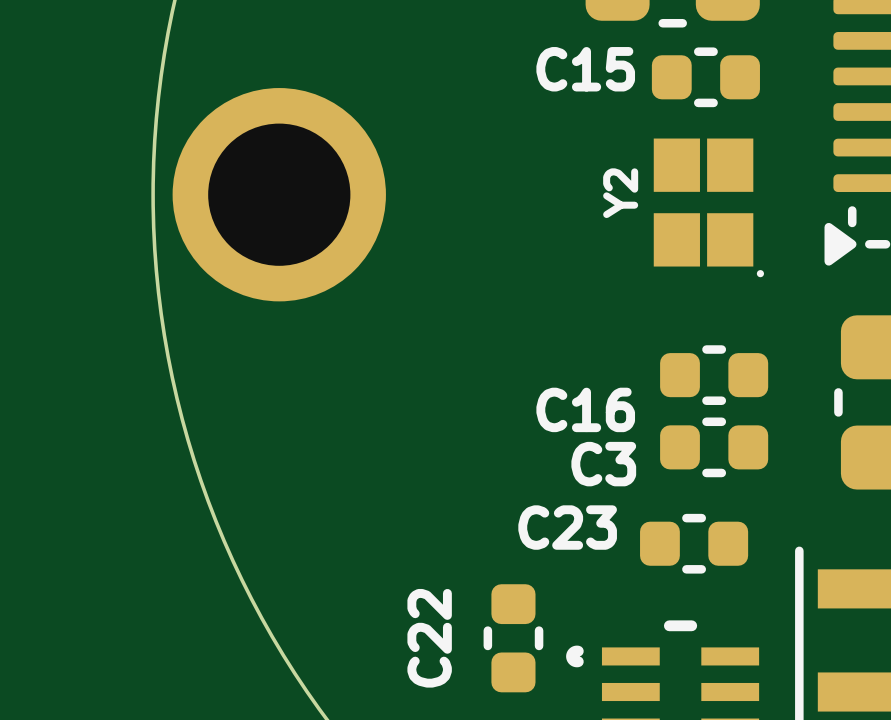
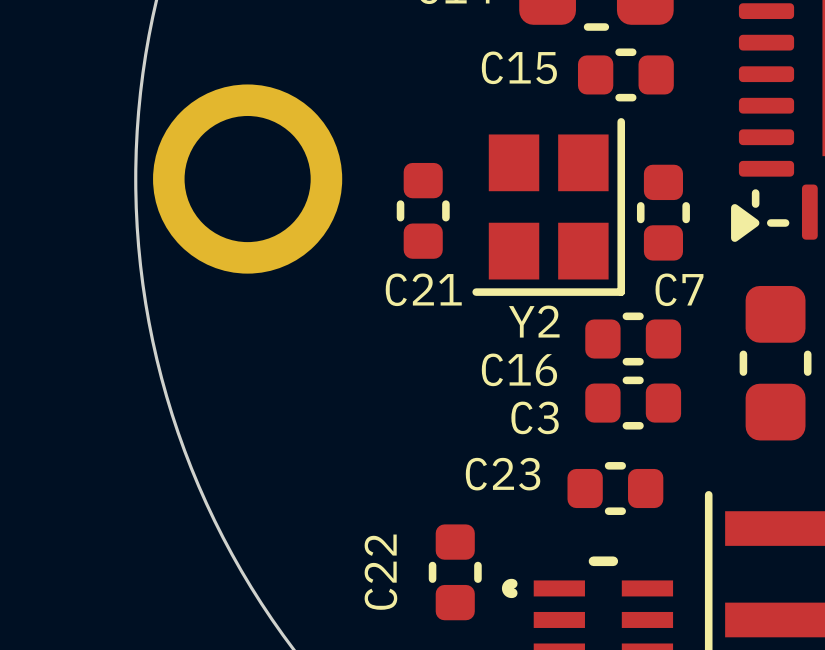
Y2 footprint: [653, 138, 764, 278] -> [472, 118, 625, 296]
Y2 name position: Y2 (620, 193) -> Y2 (534, 321)
C21: none -> (423, 210)
C7: none -> (663, 212)

